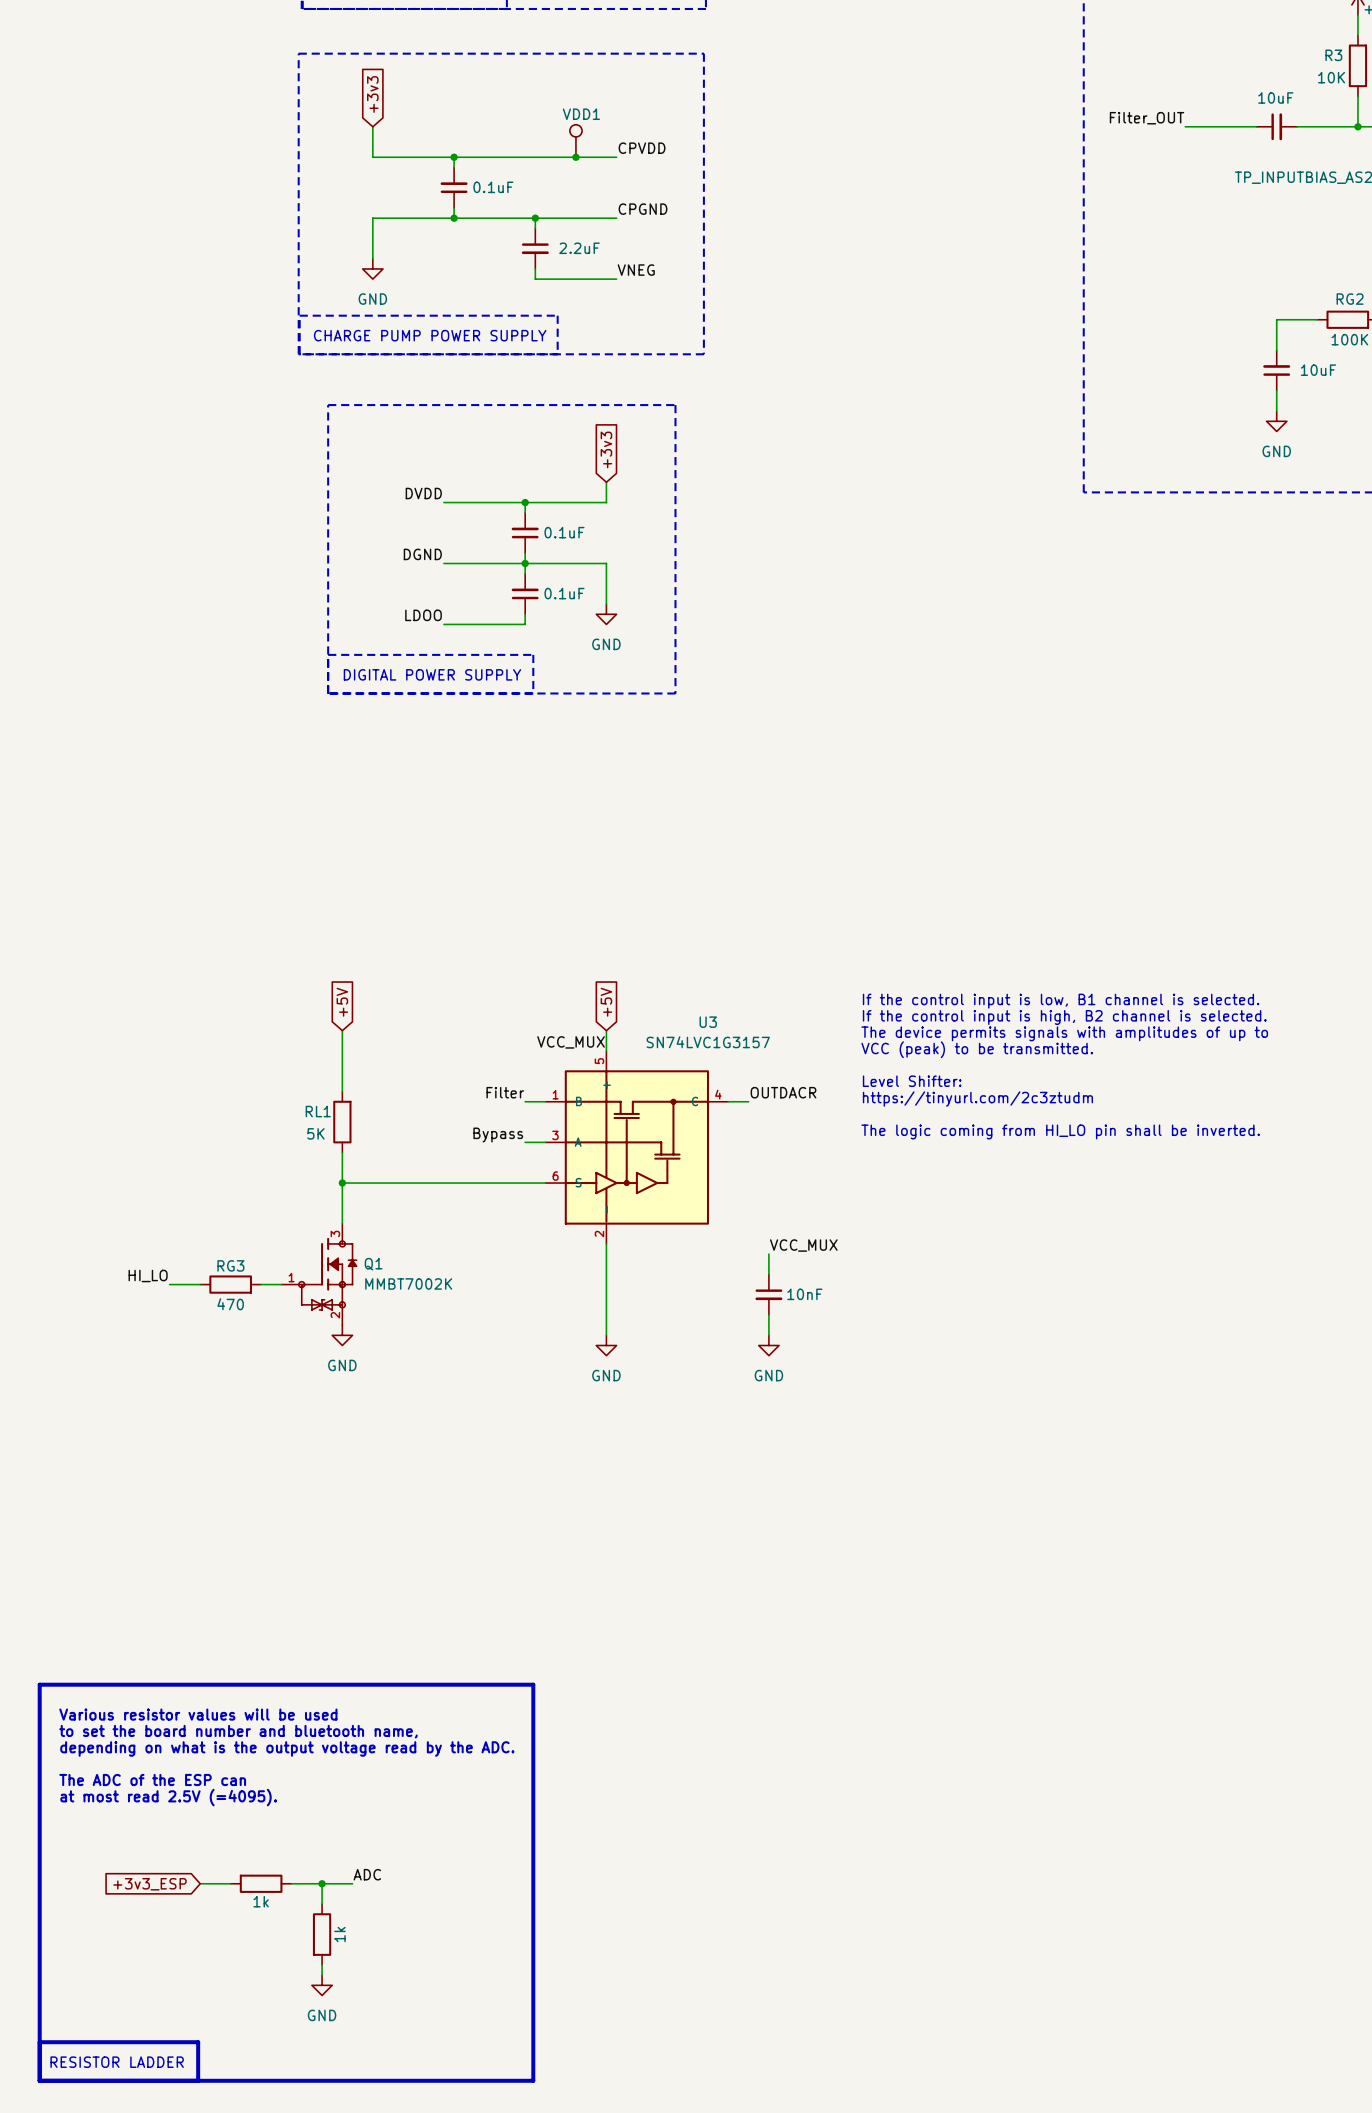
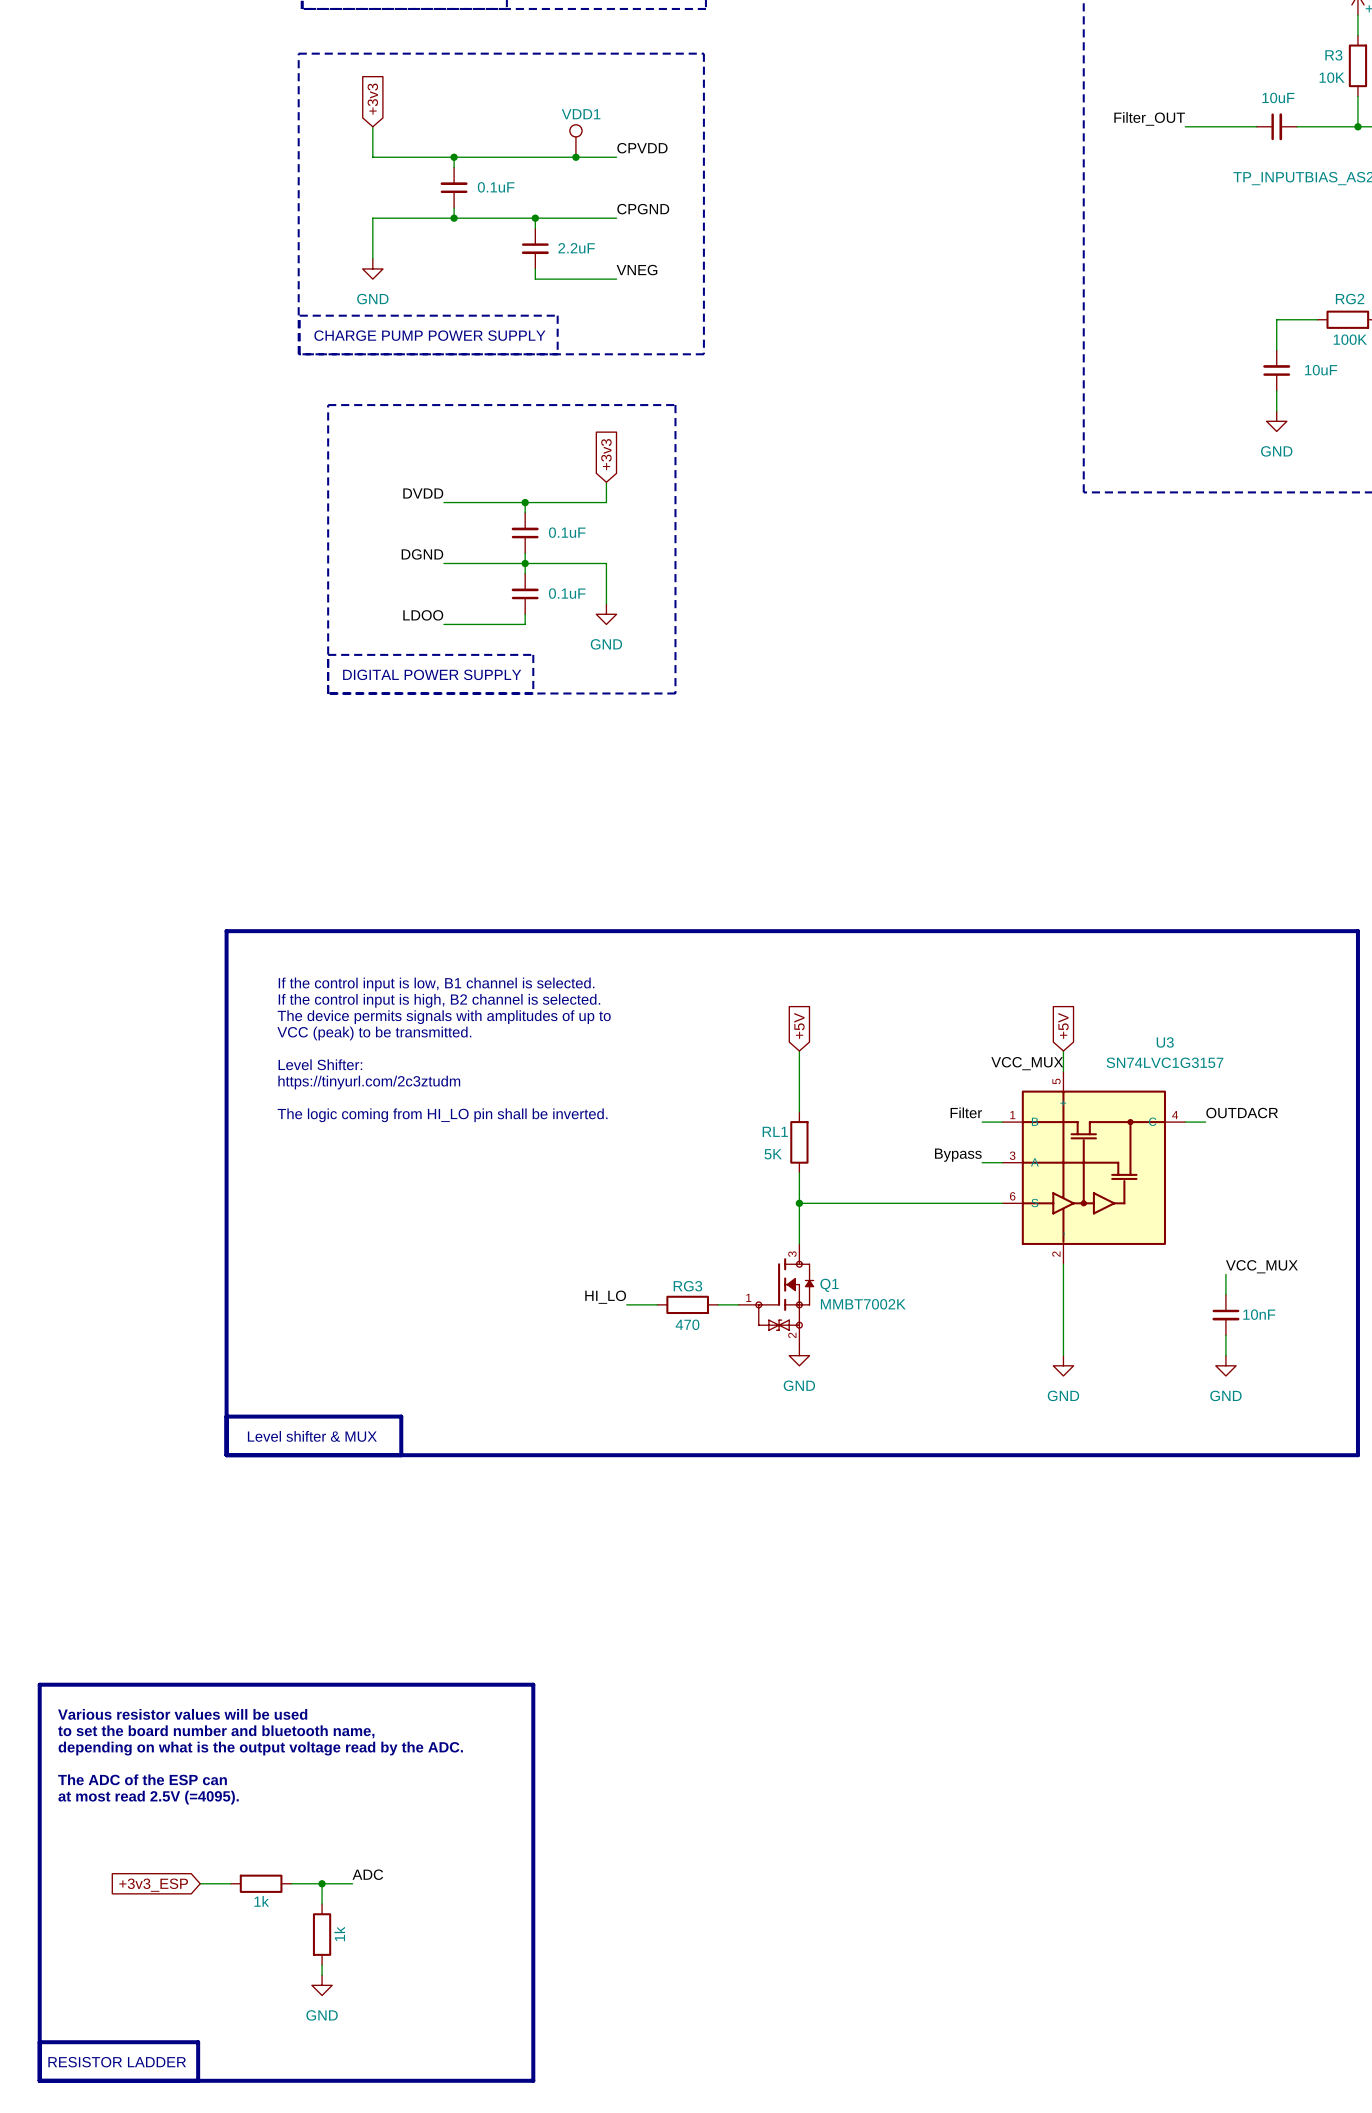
line: none -> (226, 931) (1357, 931) (1357, 1455) (226, 1455) (226, 931)
text: none -> If the control input is low, B1 channel is selected. (436, 984)
text: none -> If the control input is high, B2 channel is selected. (439, 1000)
text: If the control input is low, B1 channel is selected. (1061, 1001) -> none
global label: +5V (342, 1002) -> none
global label position: +5V (606, 1002) -> +5V (799, 1025)
text: none -> The device permits signals with amplitudes of up to (444, 1017)
text: If the control input is high, B2 channel is selected. (1064, 1017) -> none
global label: none -> +5V (1063, 1025)
wire: (342, 1030) (342, 1091) -> none
wire: (606, 1030) (606, 1050) -> none
text: none -> VCC (peak) to be transmitted. (374, 1033)
text: The device permits signals with amplitudes of up to (1064, 1033) -> none
label: VCC_MUX (571, 1042) -> none
text: VCC (peak) to be transmitted. (977, 1049) -> none
wire: none -> (799, 1050) (799, 1111)
wire: none -> (1063, 1050) (1063, 1071)
label: none -> VCC_MUX (1027, 1063)
text: none -> Level Shifter: (320, 1064)
text: Level Shifter: (912, 1081) -> none
text: none -> https://tinyurl.com/2c3ztudm (369, 1082)
label: Filter (505, 1092) -> none
label: OUTDACR (783, 1092) -> none
text: https://tinyurl.com/2c3ztudm (977, 1099) -> none
wire: (525, 1101) (545, 1101) -> none
wire: (728, 1101) (748, 1101) -> none
label: none -> Filter (966, 1112)
label: none -> OUTDACR (1242, 1113)
text: none -> The logic coming from HI_LO pin shall be inverted. (442, 1115)
RL1 position: (342, 1122) -> (799, 1142)
wire: none -> (982, 1122) (1002, 1122)
wire: none -> (1185, 1122) (1205, 1122)
text: The logic coming from HI_LO pin shall be inverted. (1060, 1131) -> none
label: Bypass (498, 1135) -> none
wire: (525, 1142) (545, 1142) -> none
U3 position: (636, 1147) -> (1093, 1167)
wire: (342, 1152) (342, 1223) -> none
label: none -> Bypass (958, 1155)
wire: none -> (982, 1162) (1002, 1162)
wire: none -> (799, 1172) (799, 1243)
wire: (342, 1183) (545, 1183) -> none
junction: (342, 1183) -> none
wire: none -> (799, 1203) (1002, 1203)
junction: none -> (799, 1203)
wire: (606, 1243) (606, 1335) -> none
label: VCC_MUX (803, 1245) -> none
wire: (768, 1254) (768, 1274) -> none
wire: none -> (1063, 1264) (1063, 1355)
label: none -> VCC_MUX (1261, 1266)
Q1 position: (319, 1274) -> (776, 1294)
wire: none -> (1225, 1274) (1225, 1294)
label: HI_LO (148, 1275) -> none
wire: (169, 1284) (200, 1284) -> none
RG3 position: (230, 1284) -> (687, 1304)
wire: (261, 1284) (281, 1284) -> none
part: 10nF (768, 1294) -> none
label: none -> HI_LO (605, 1297)
wire: none -> (626, 1304) (657, 1304)
wire: none -> (718, 1304) (738, 1304)
part: none -> 10nF (1225, 1315)
power symbol: GND (342, 1335) -> none
wire: none -> (1225, 1335) (1225, 1355)
power symbol: GND (606, 1345) -> none
power symbol position: GND (768, 1345) -> GND (799, 1355)
power symbol: none -> GND (1063, 1365)
power symbol: none -> GND (1225, 1365)
line: none -> (226, 1416) (401, 1416) (401, 1455)
text: none -> Level shifter & MUX (312, 1436)

